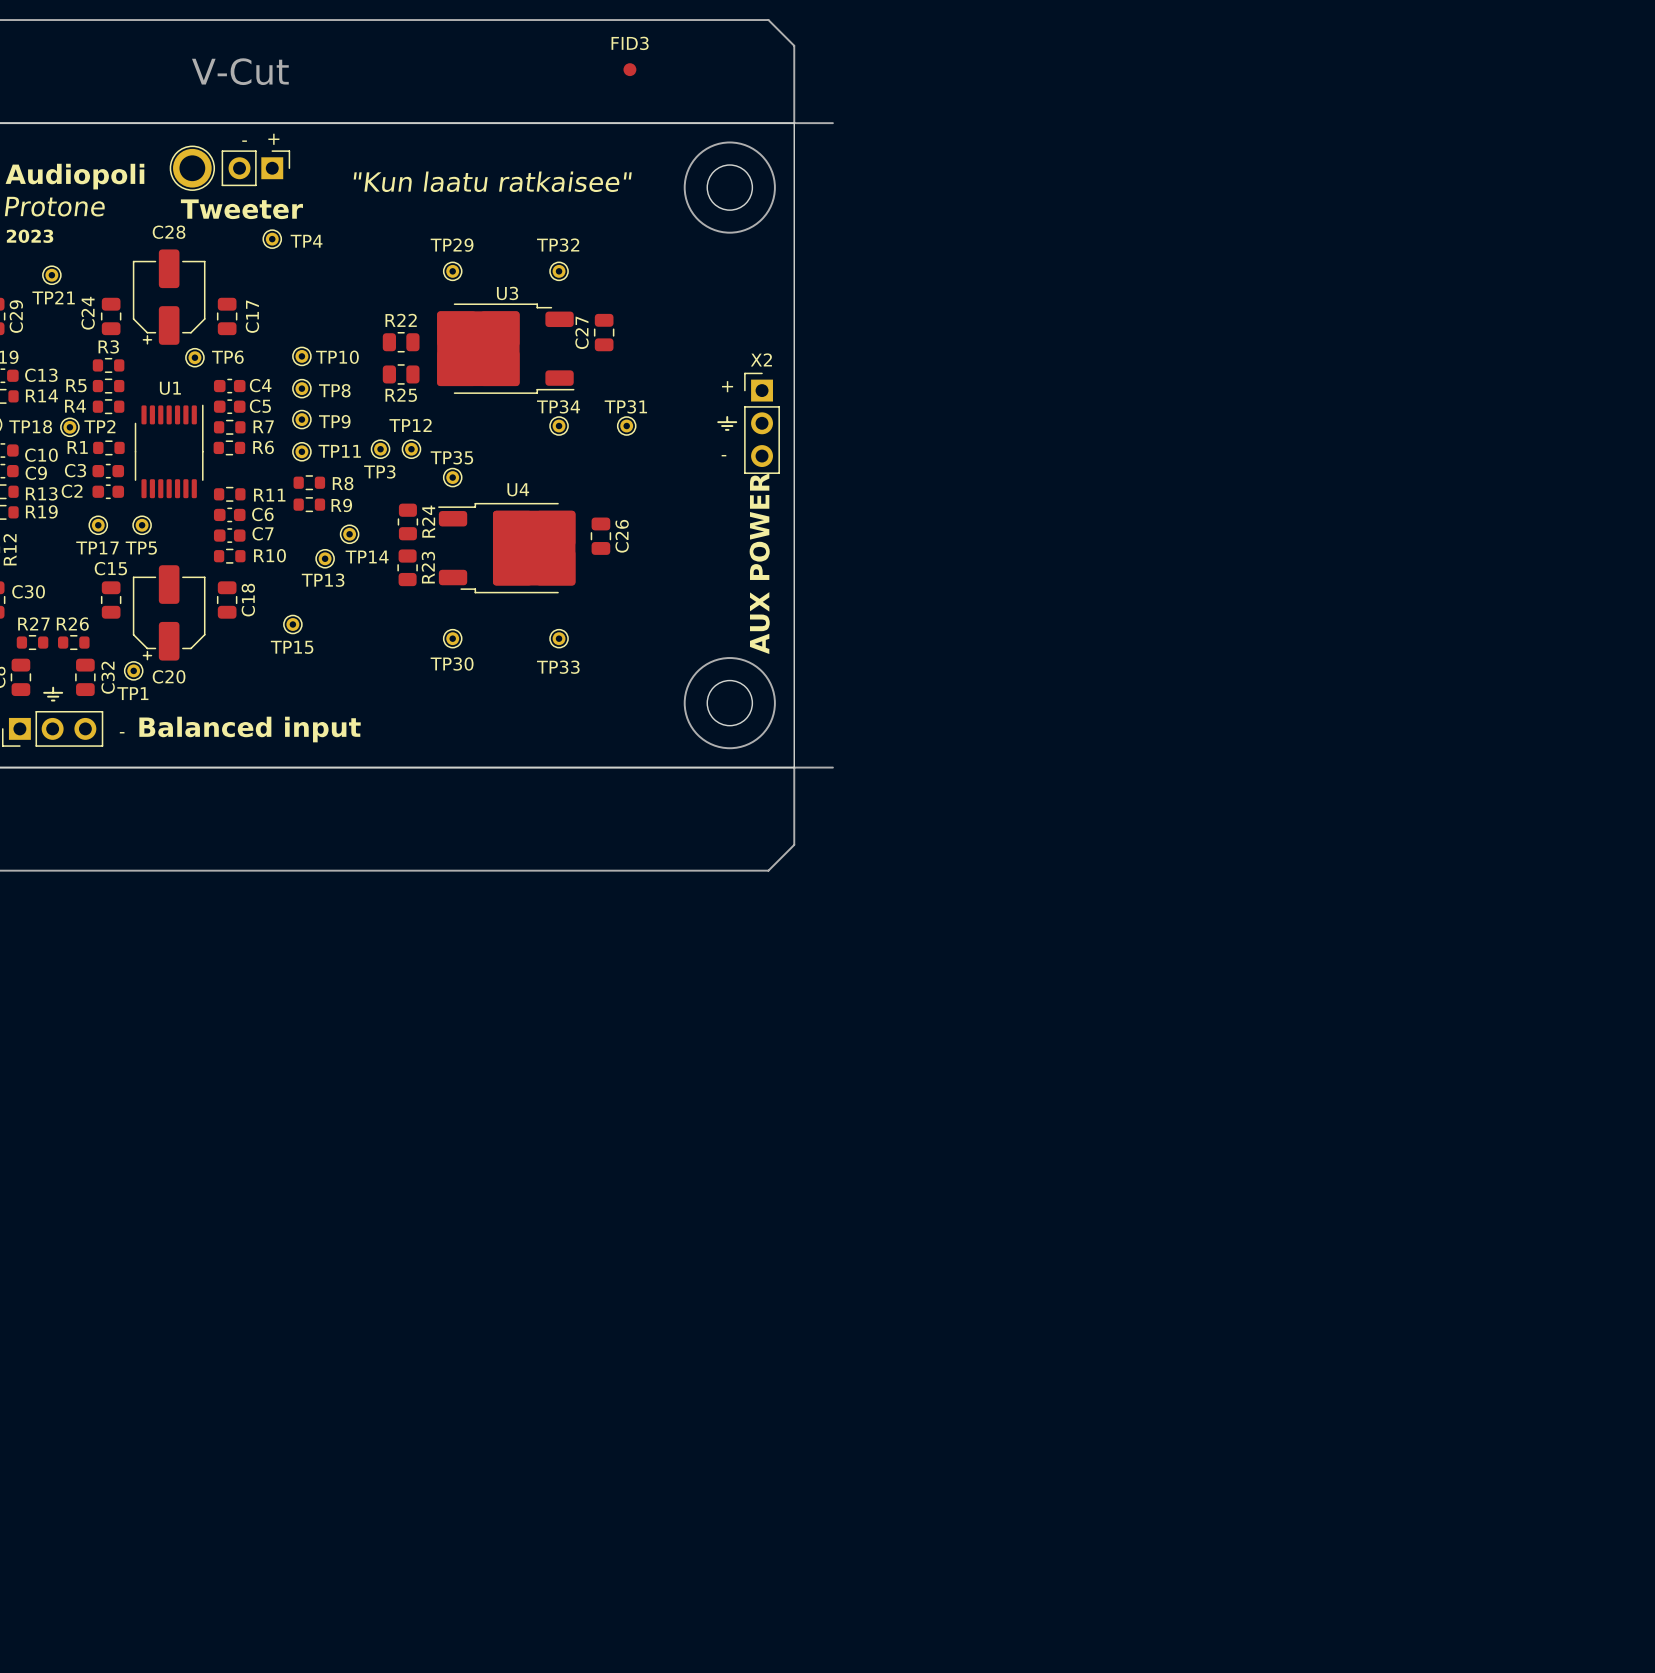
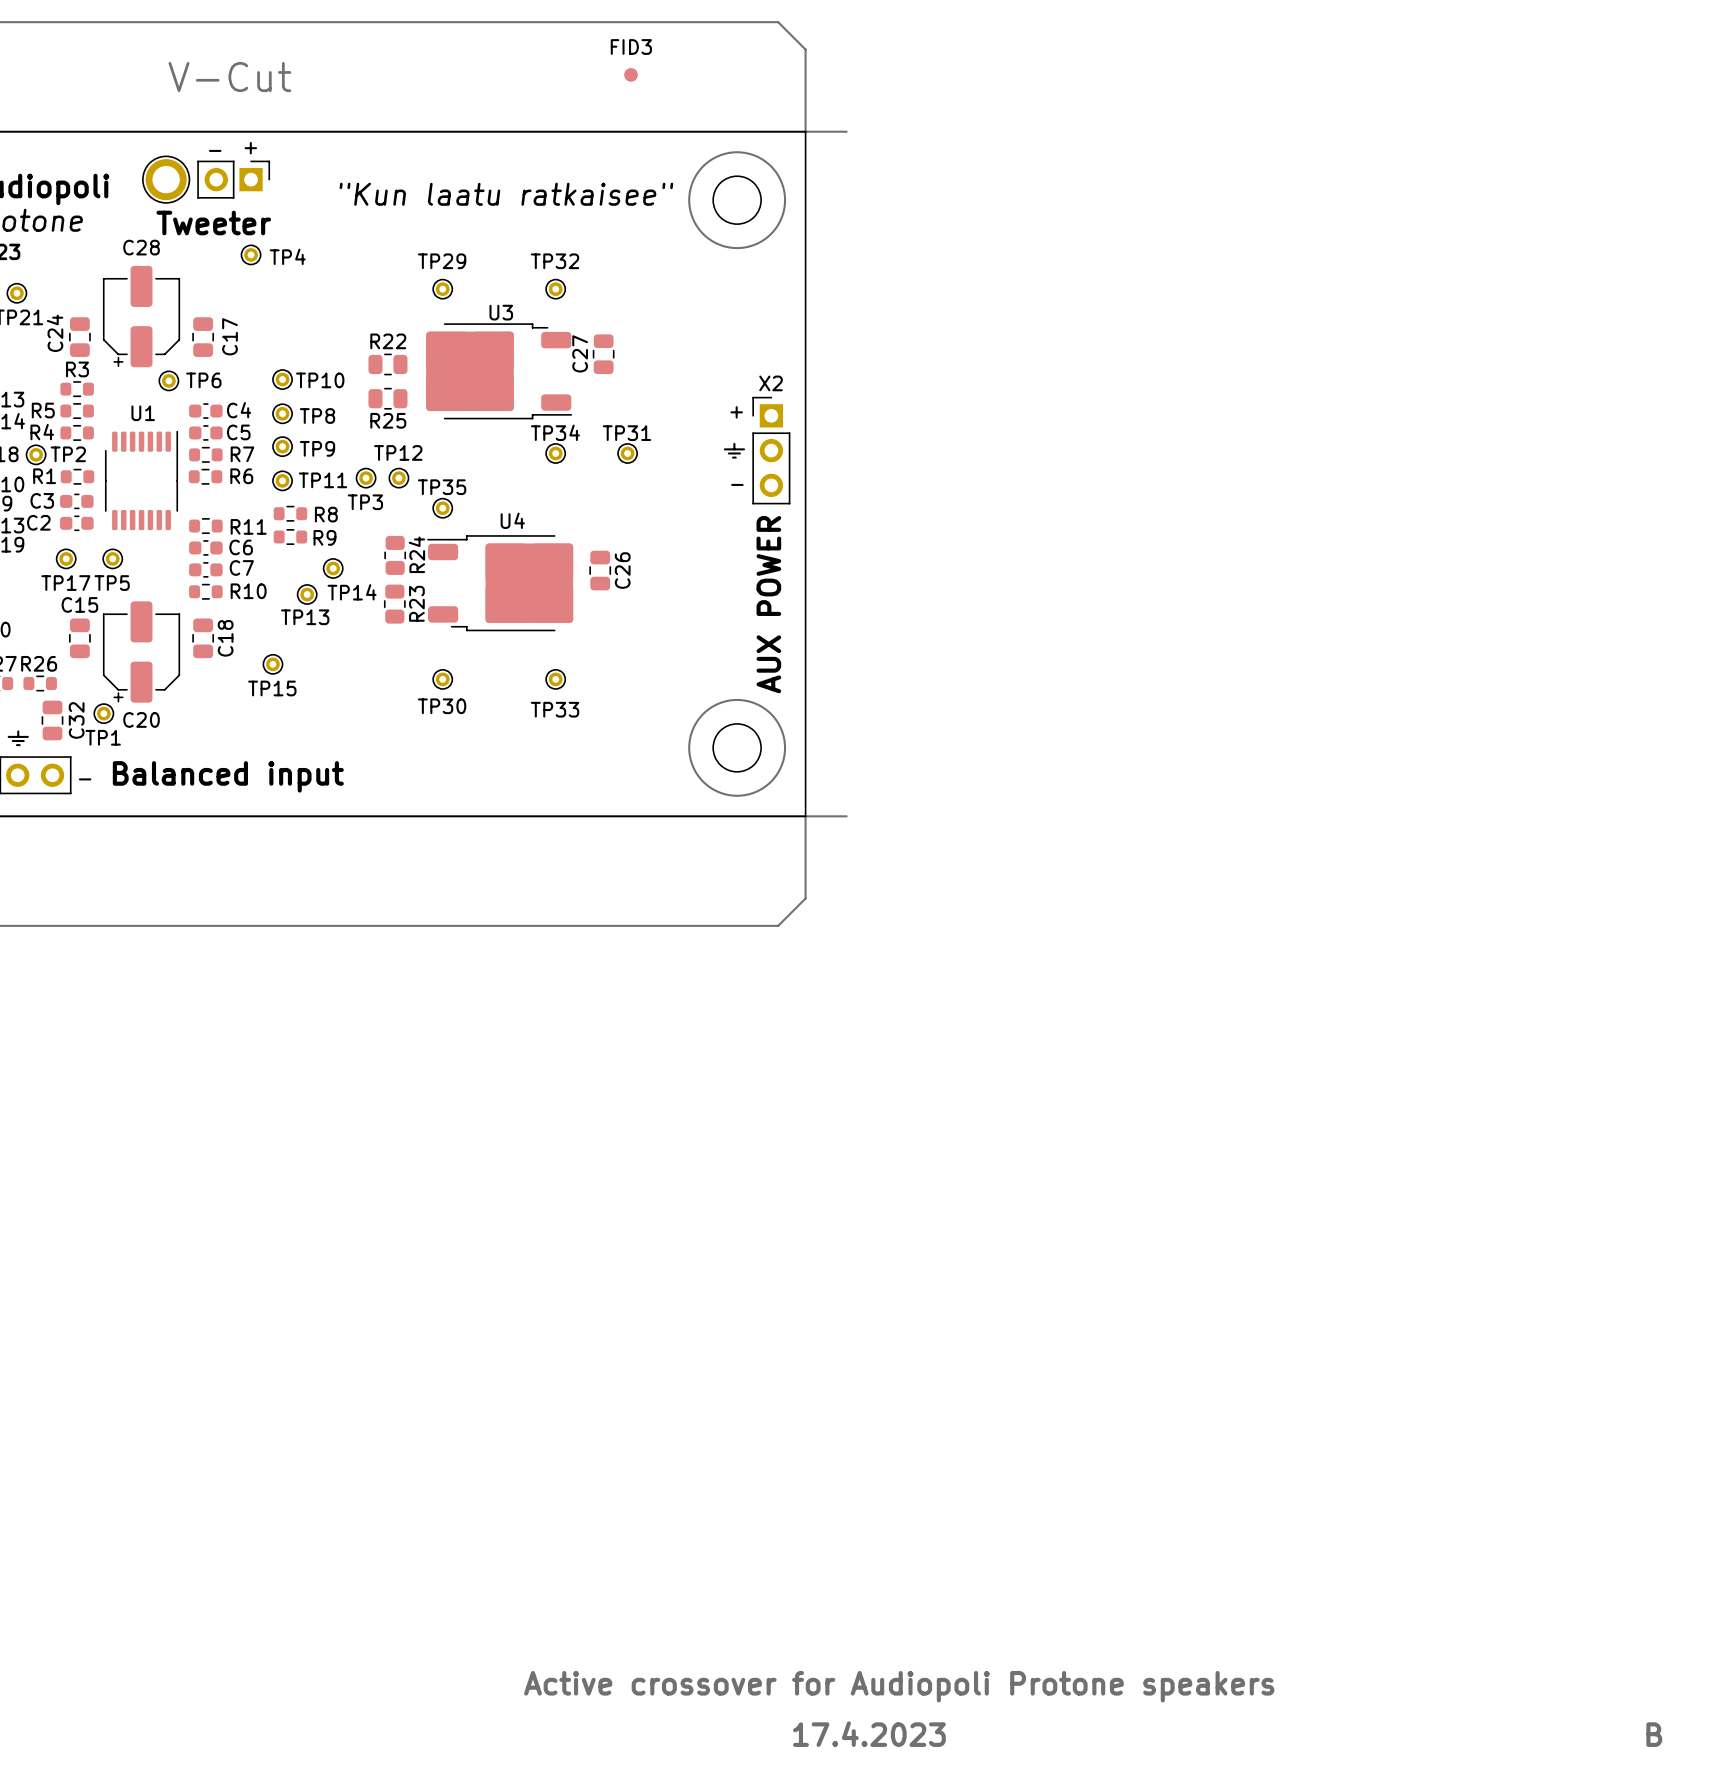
text: none -> Active crossover for Audiopoli Protone speakers (899, 1686)
text: none -> 17.4.2023 (869, 1734)
text: none -> B (1654, 1734)

